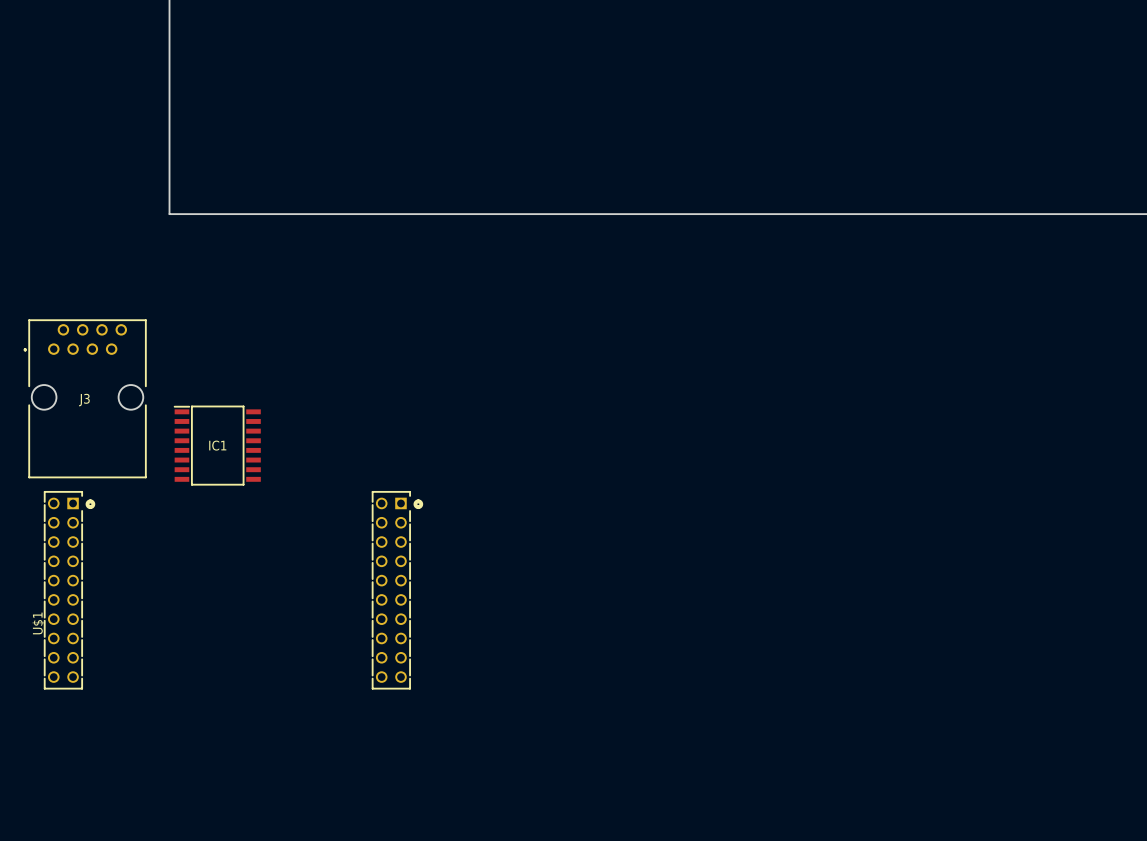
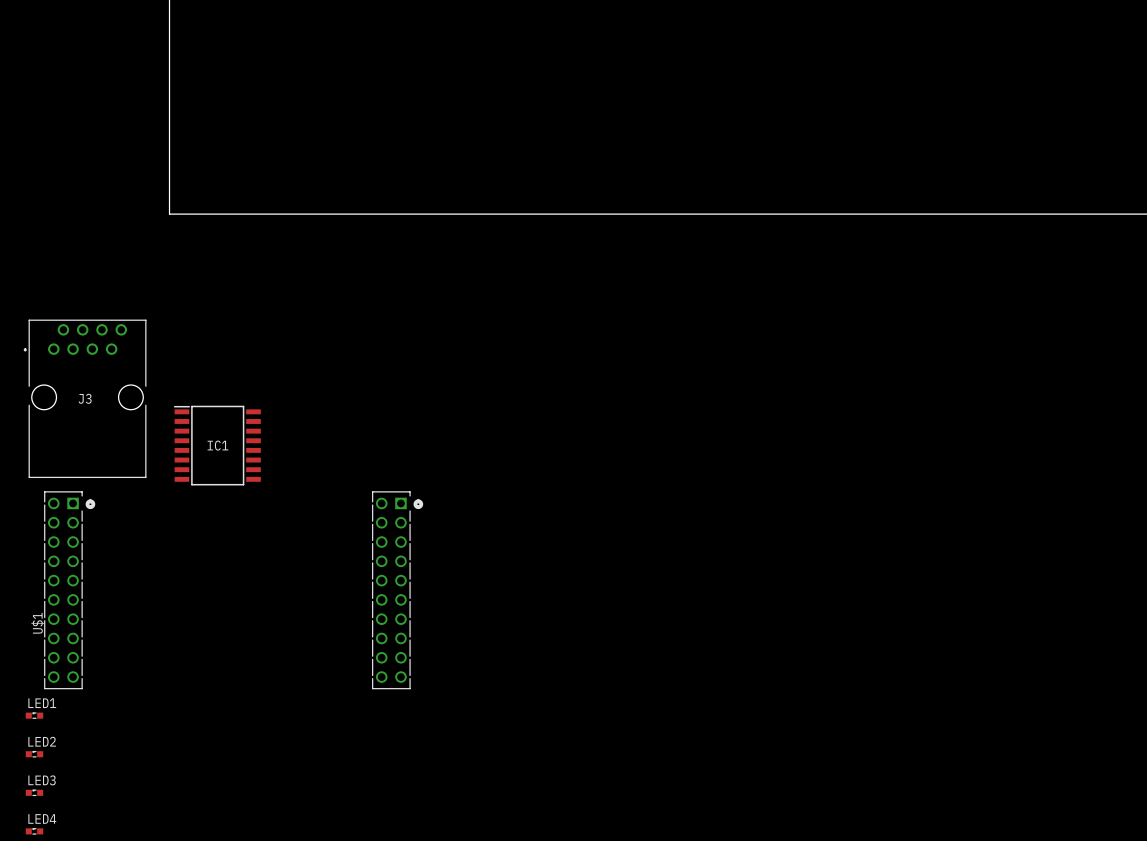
LED1: none -> (34, 715)
LED2: none -> (34, 754)
LED3: none -> (34, 792)
LED4: none -> (34, 831)

